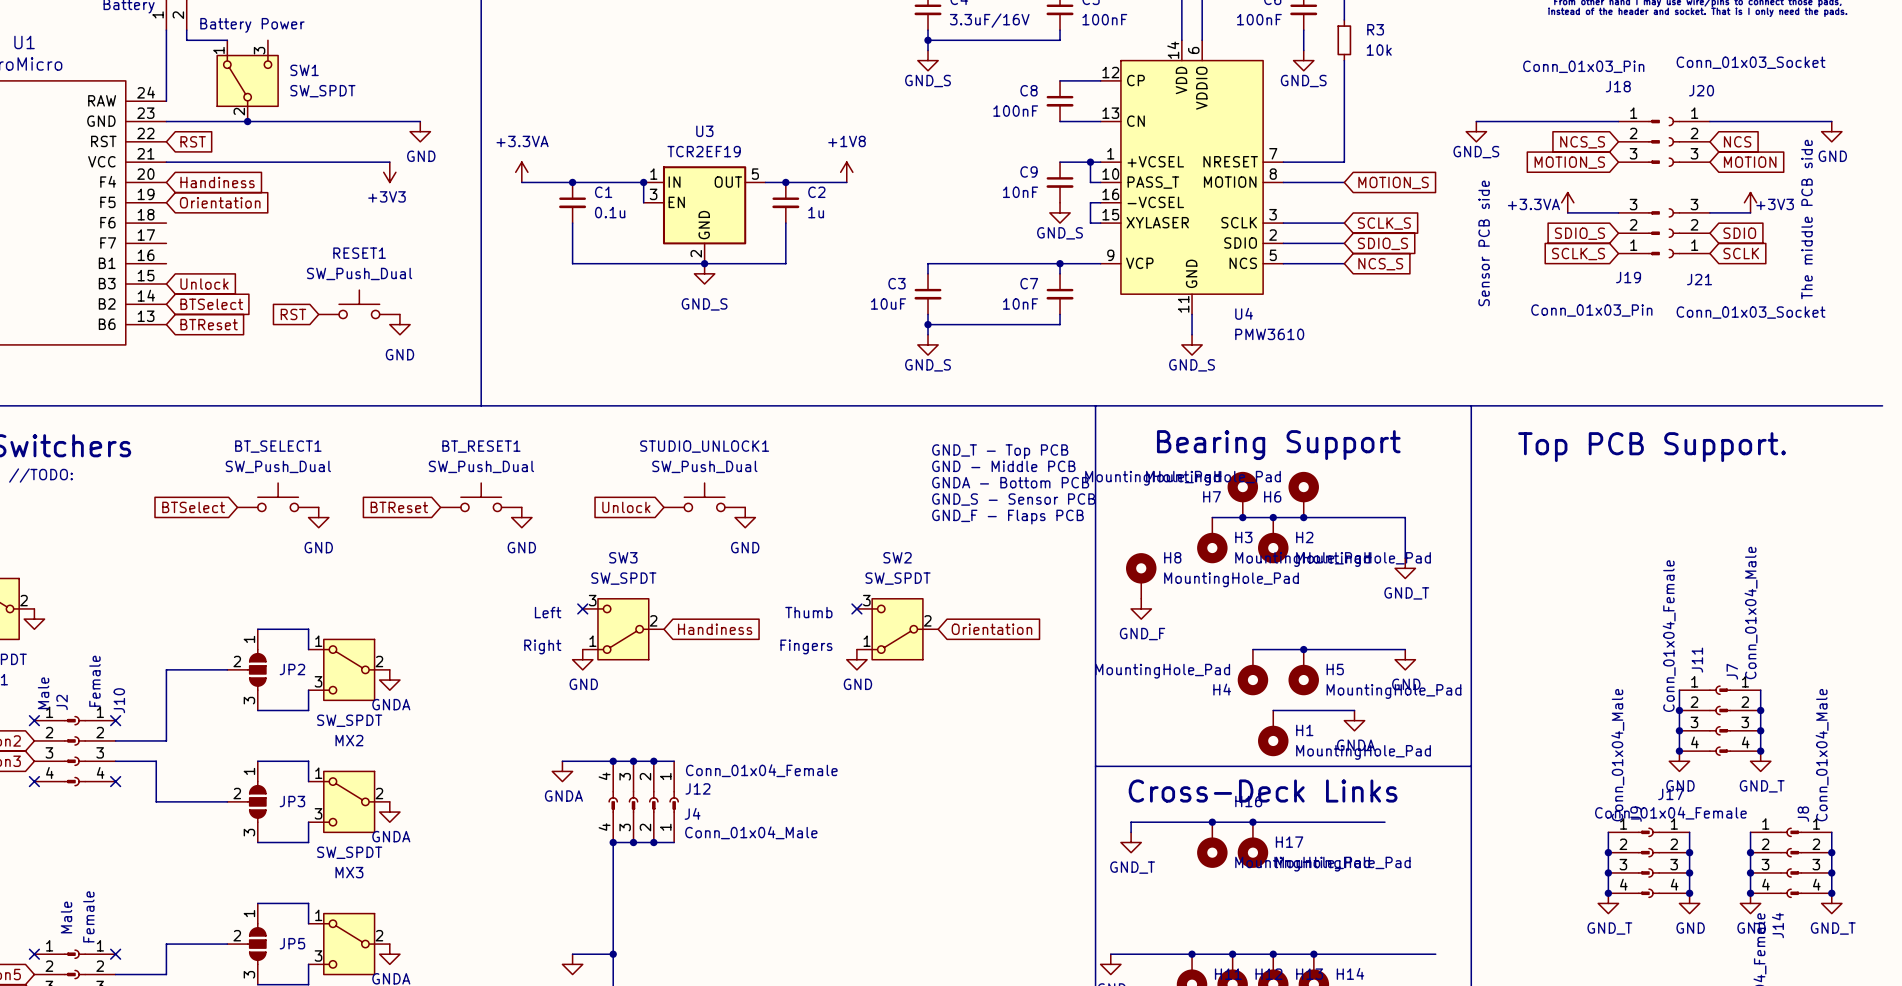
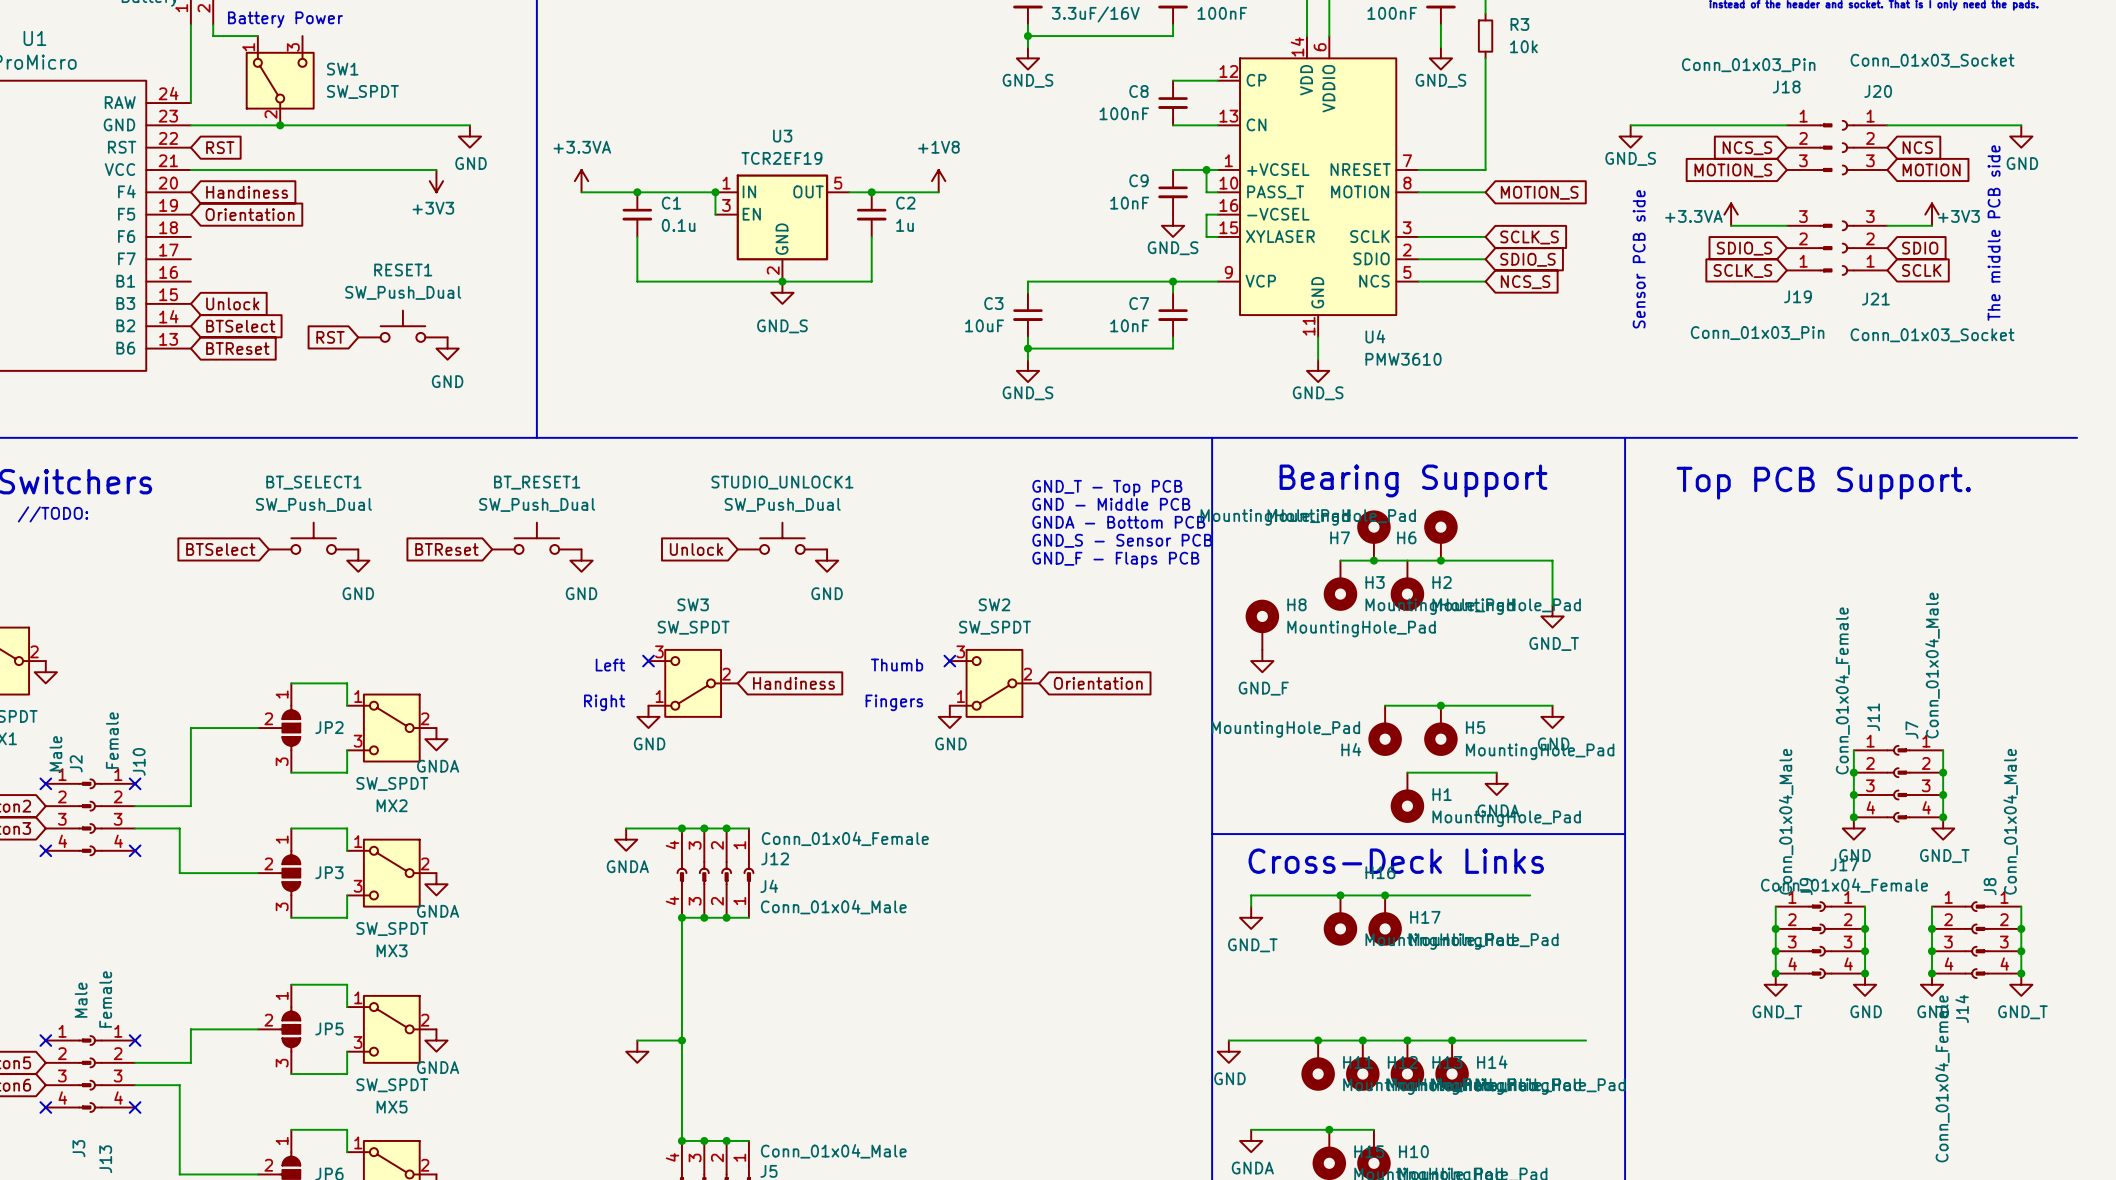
junction: (1273, 517) -> none

